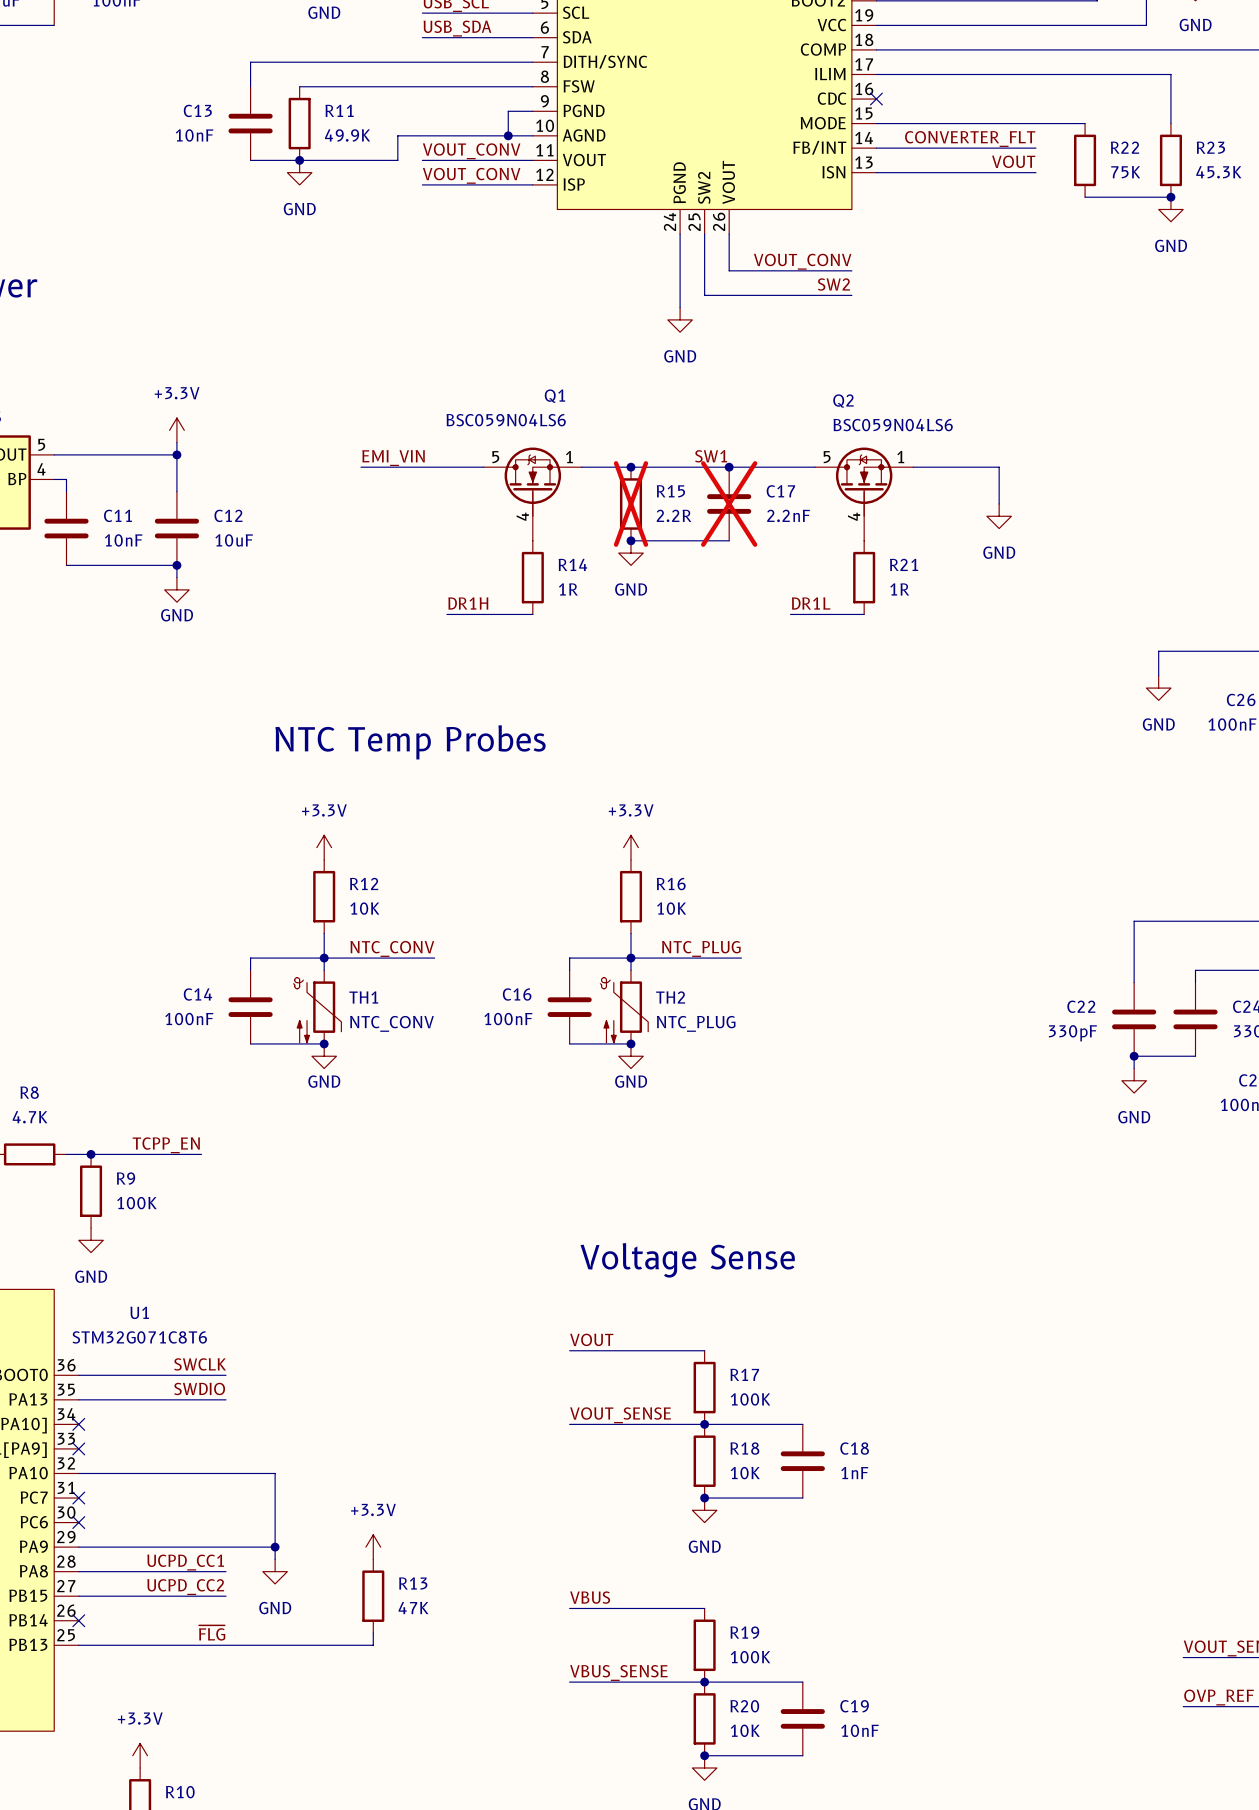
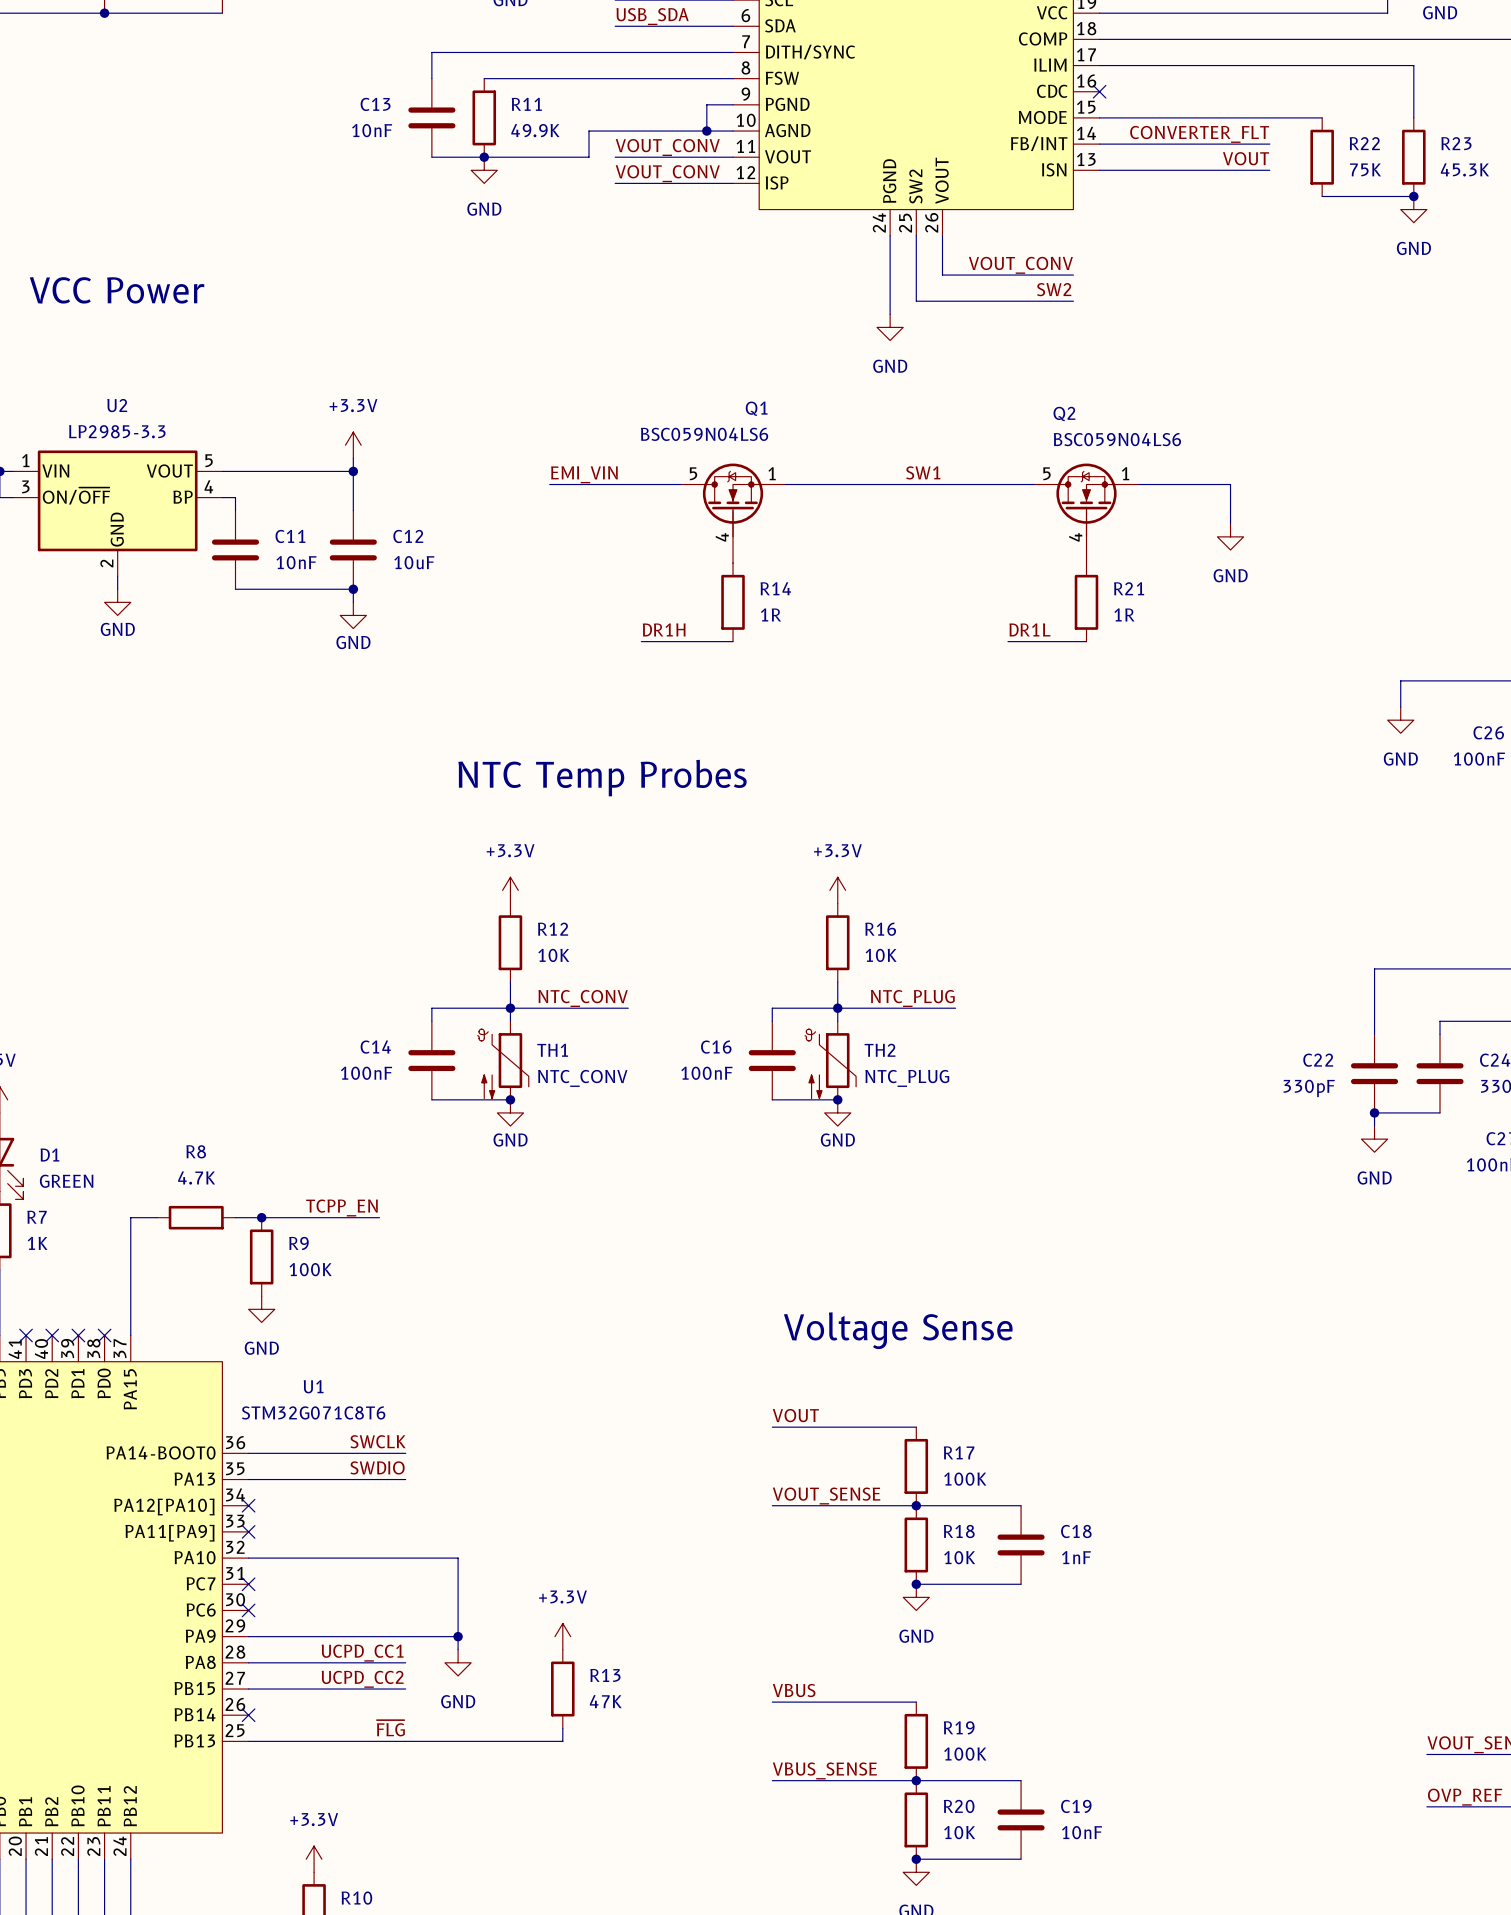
junction: (630, 467) -> none
junction: (729, 467) -> none
R15: 2.2R (630, 504) -> none
C17: 2.2nF (729, 504) -> none
wire: (630, 540) (729, 540) -> none
junction: (630, 540) -> none
power symbol: GND (630, 553) -> none

